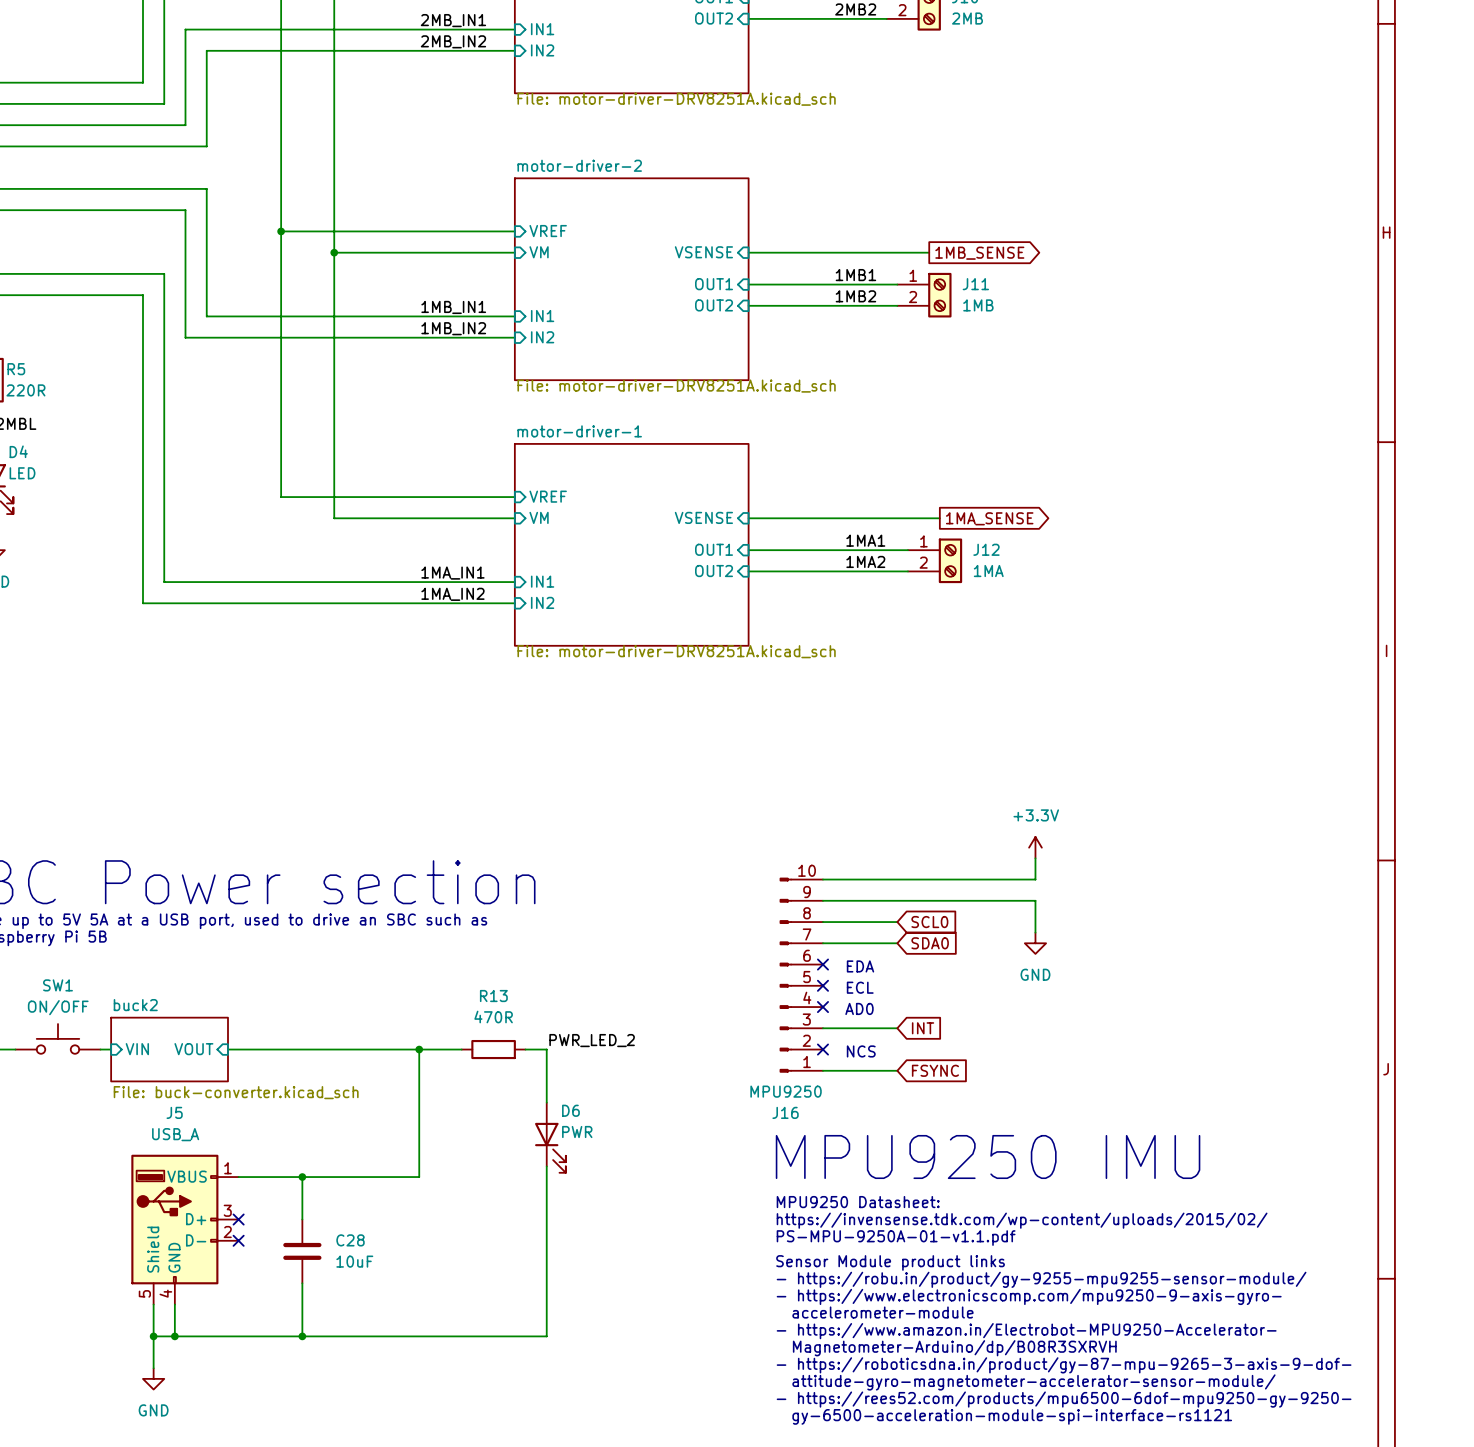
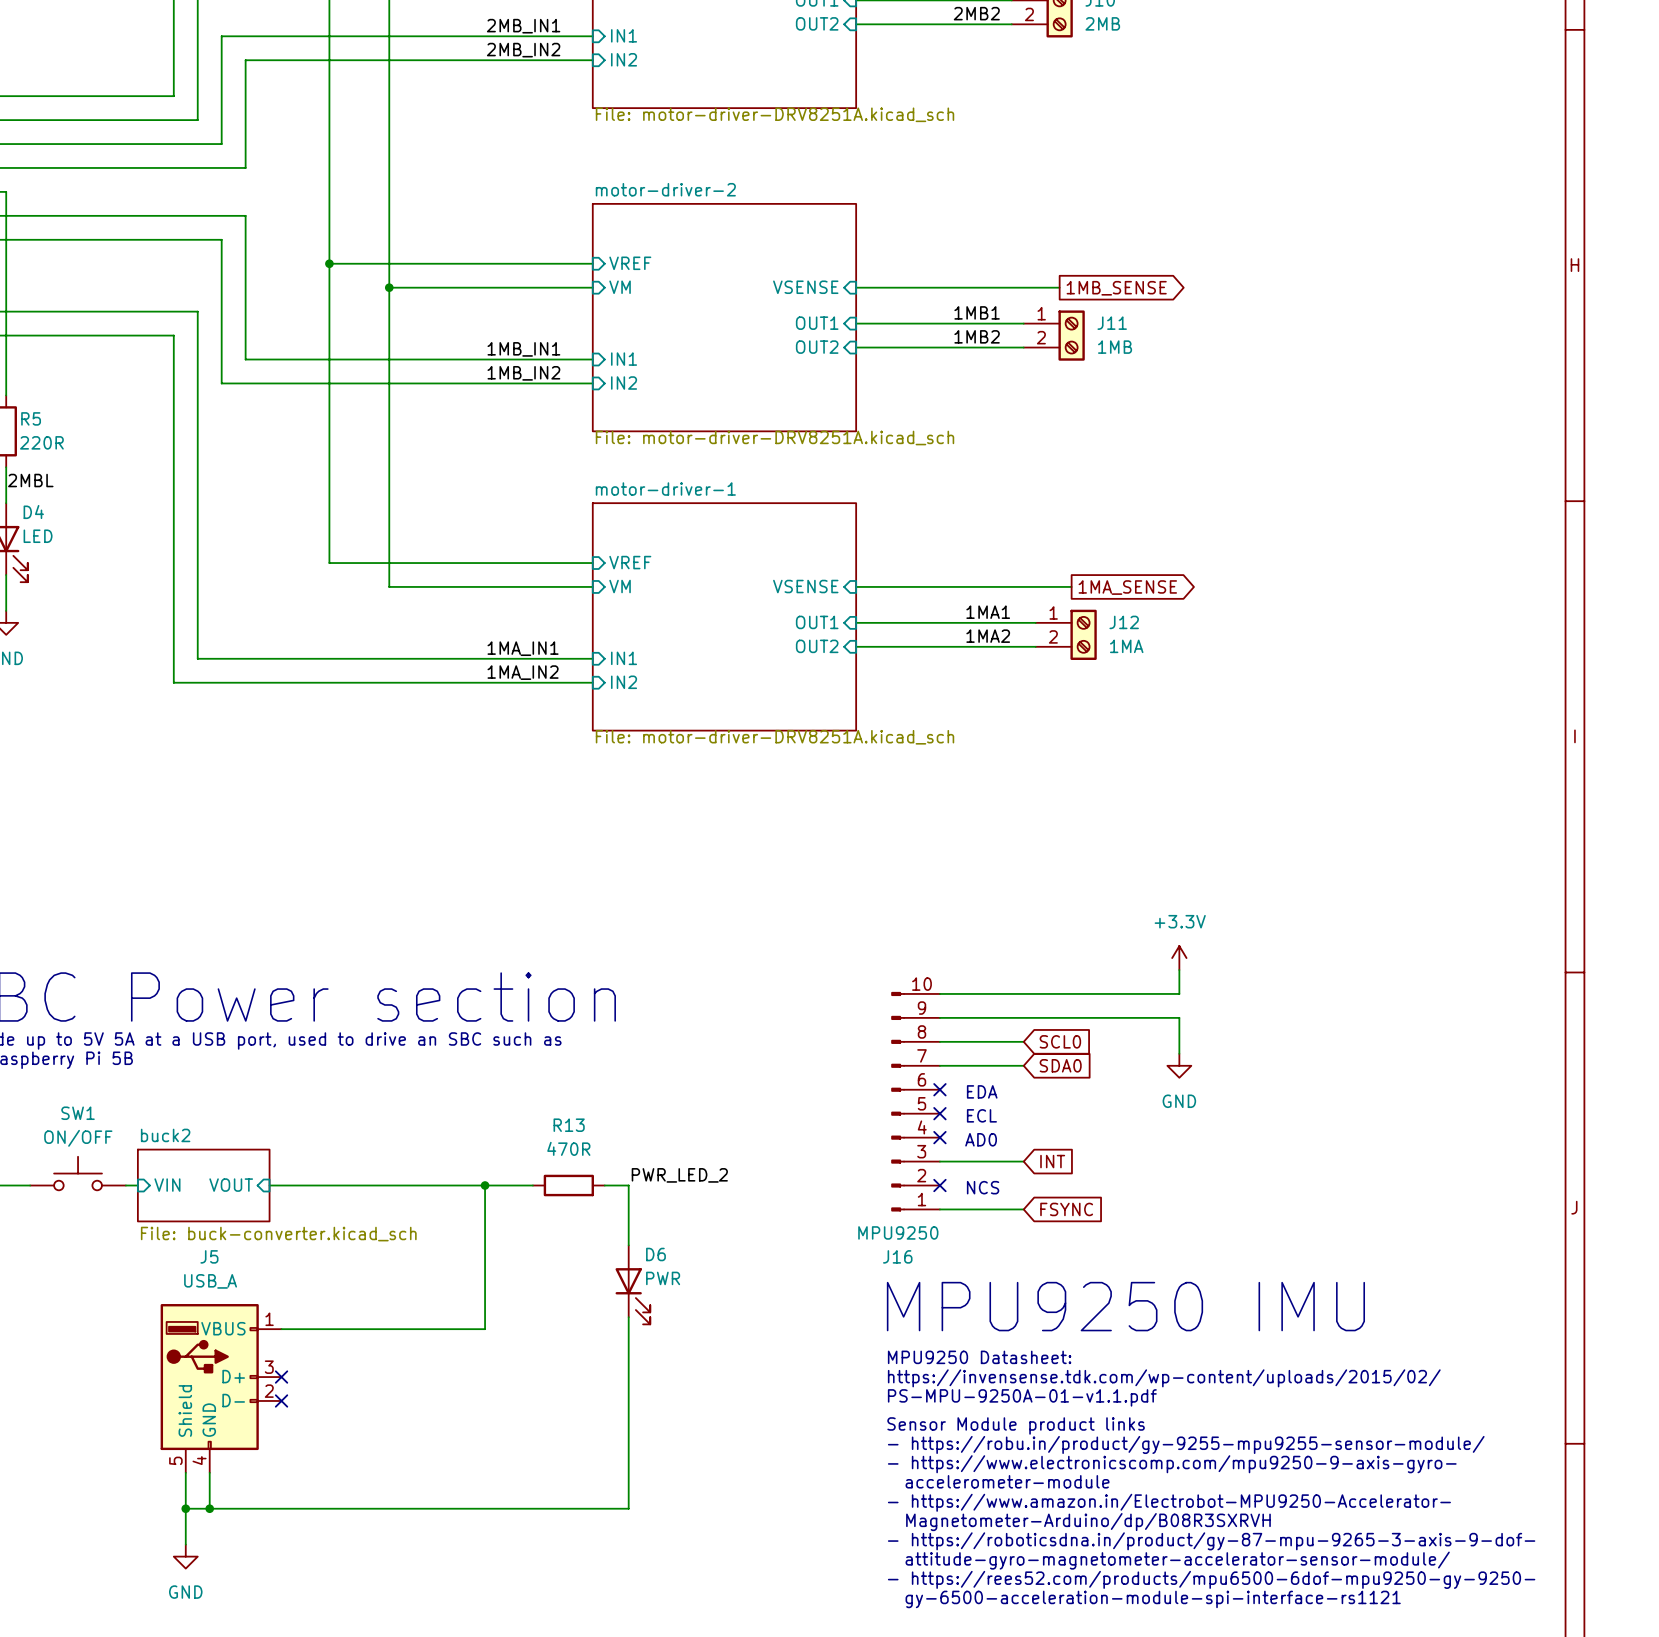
wire: (302, 1177) (302, 1219) -> none
junction: (302, 1177) -> none
C28: 10uF (302, 1251) -> none
wire: (302, 1283) (302, 1336) -> none
junction: (302, 1336) -> none

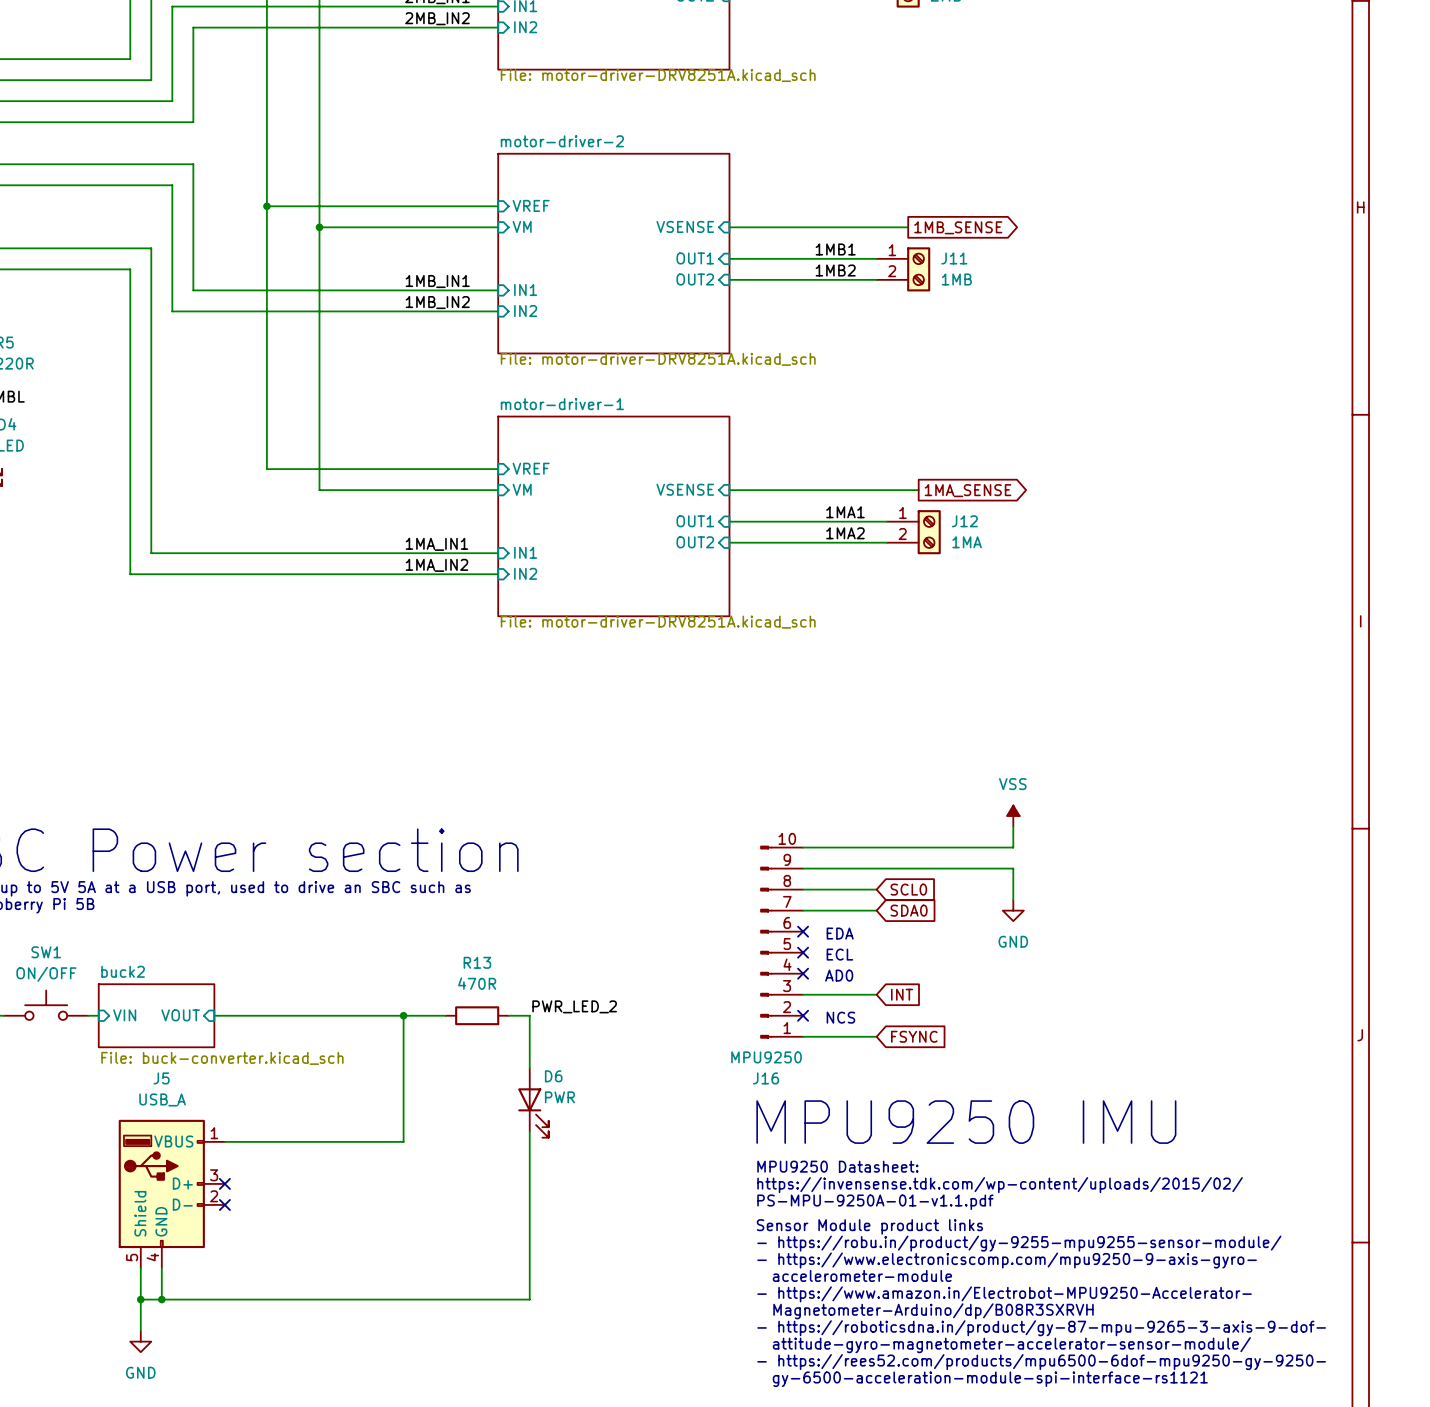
power symbol: +3.3V (1179, 958) -> VSS (1013, 816)

